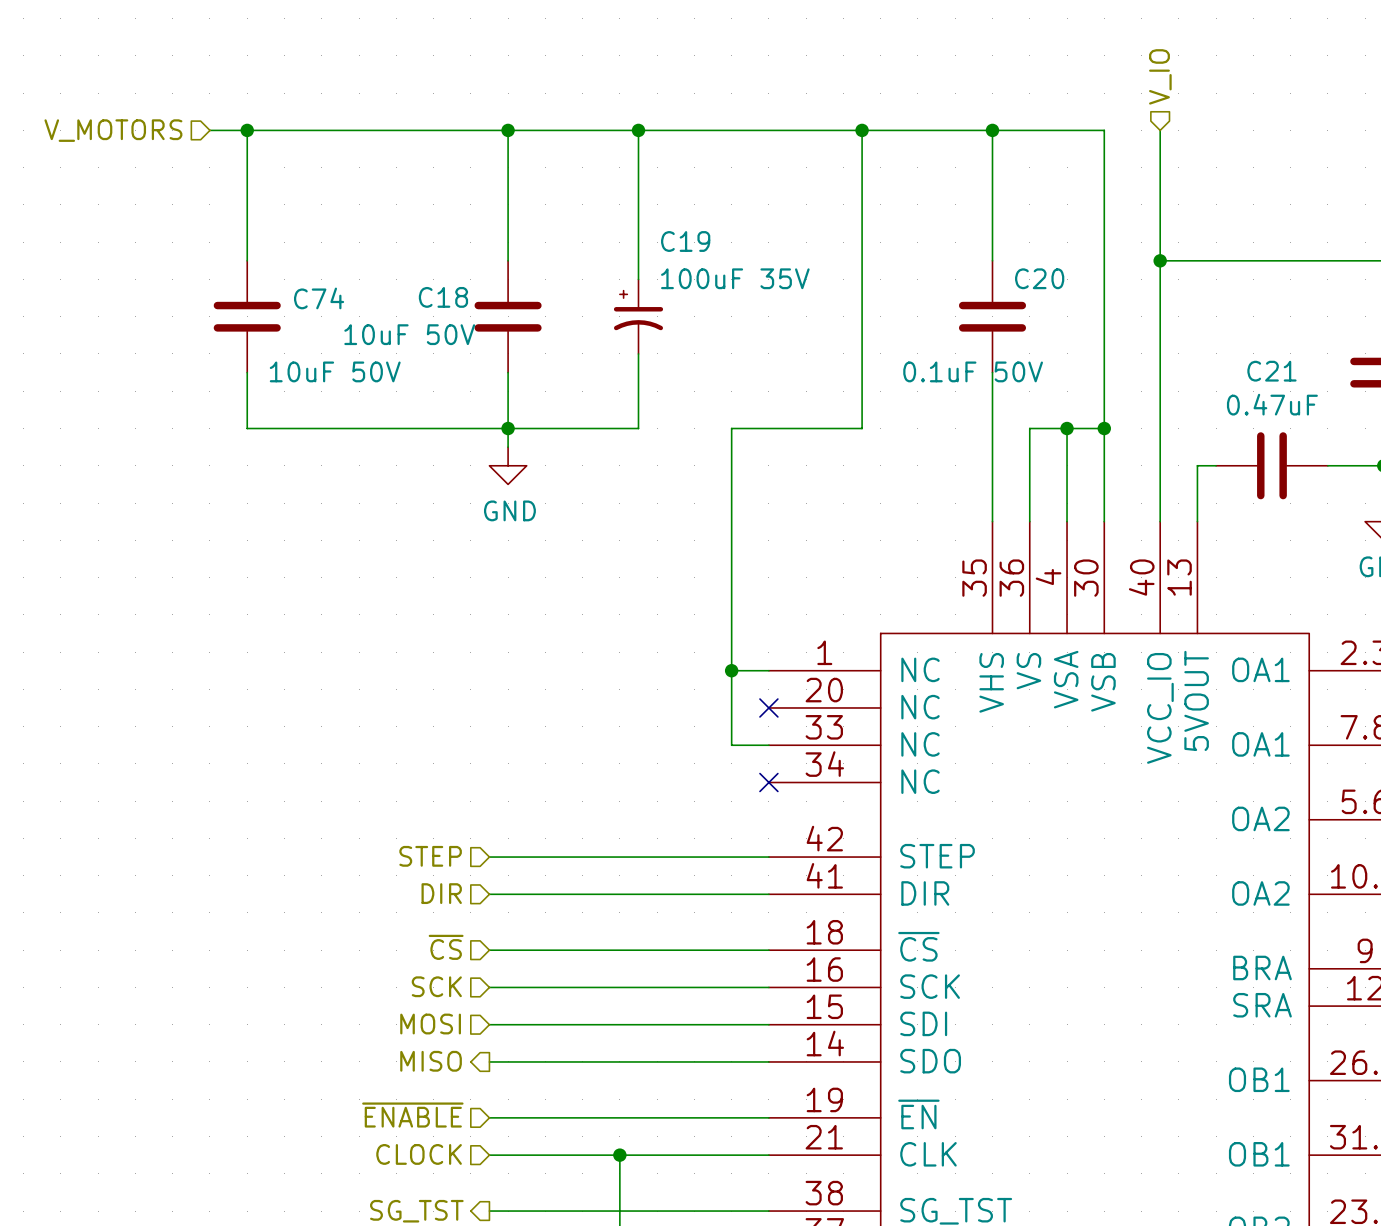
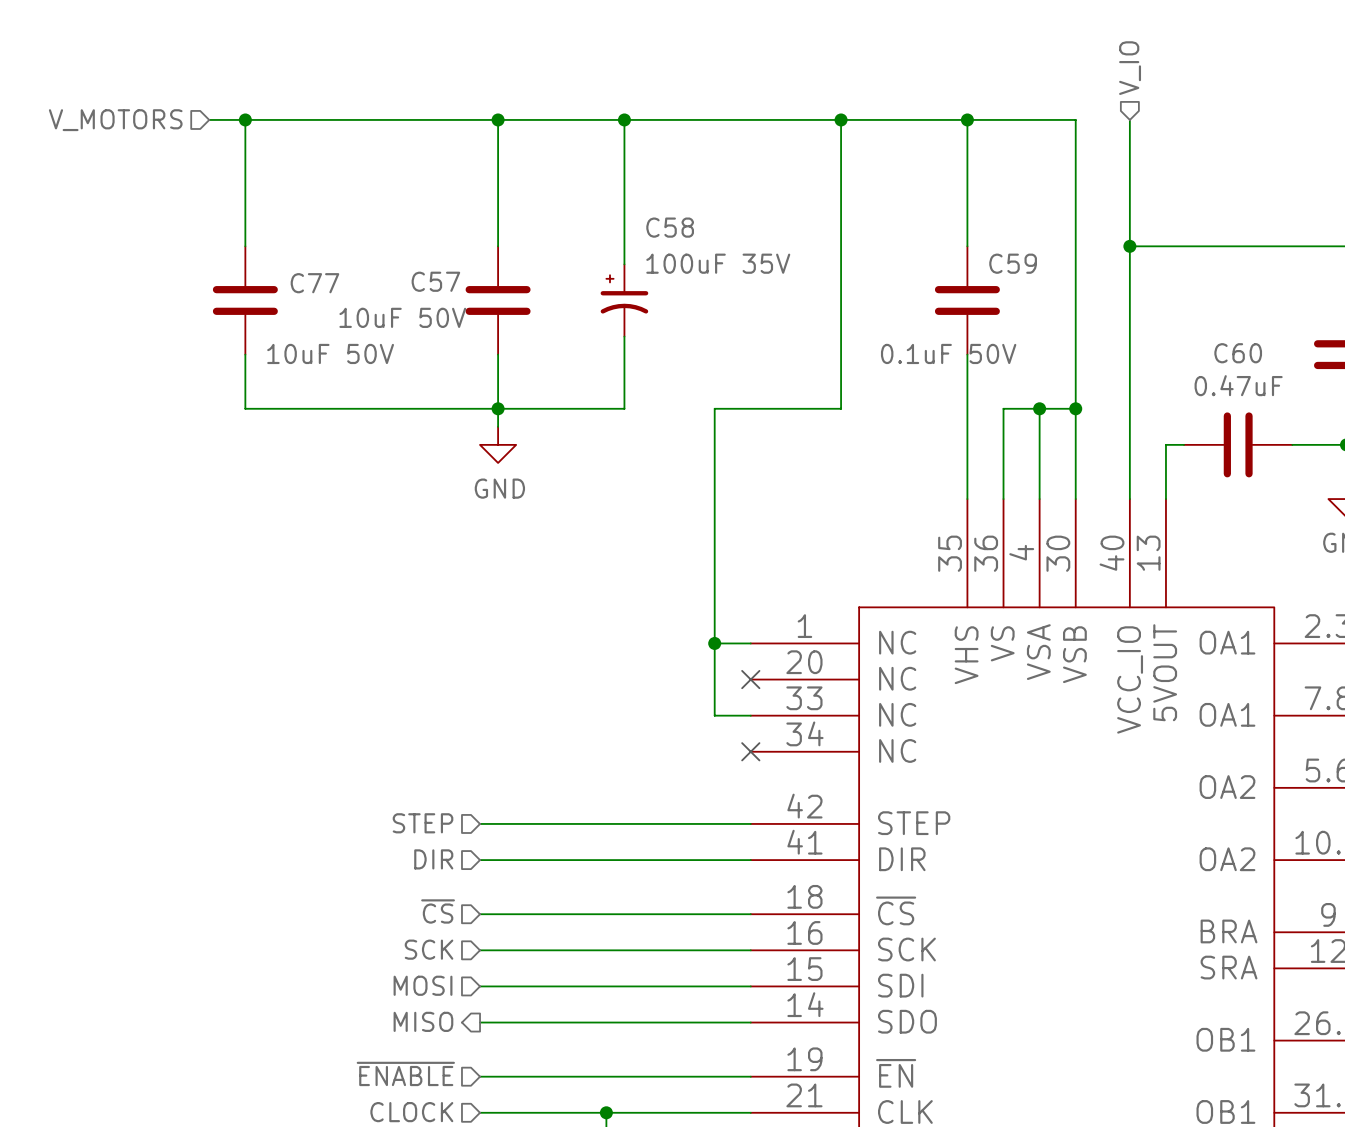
C19 name: C19 (685, 241) -> C58 (670, 227)
C20 name: C20 (1039, 278) -> C59 (1013, 263)
C18 name: C18 (443, 297) -> C57 (435, 281)
C74 name: C74 (319, 298) -> C77 (314, 283)
C21 name: C21 (1271, 371) -> C60 (1238, 353)

